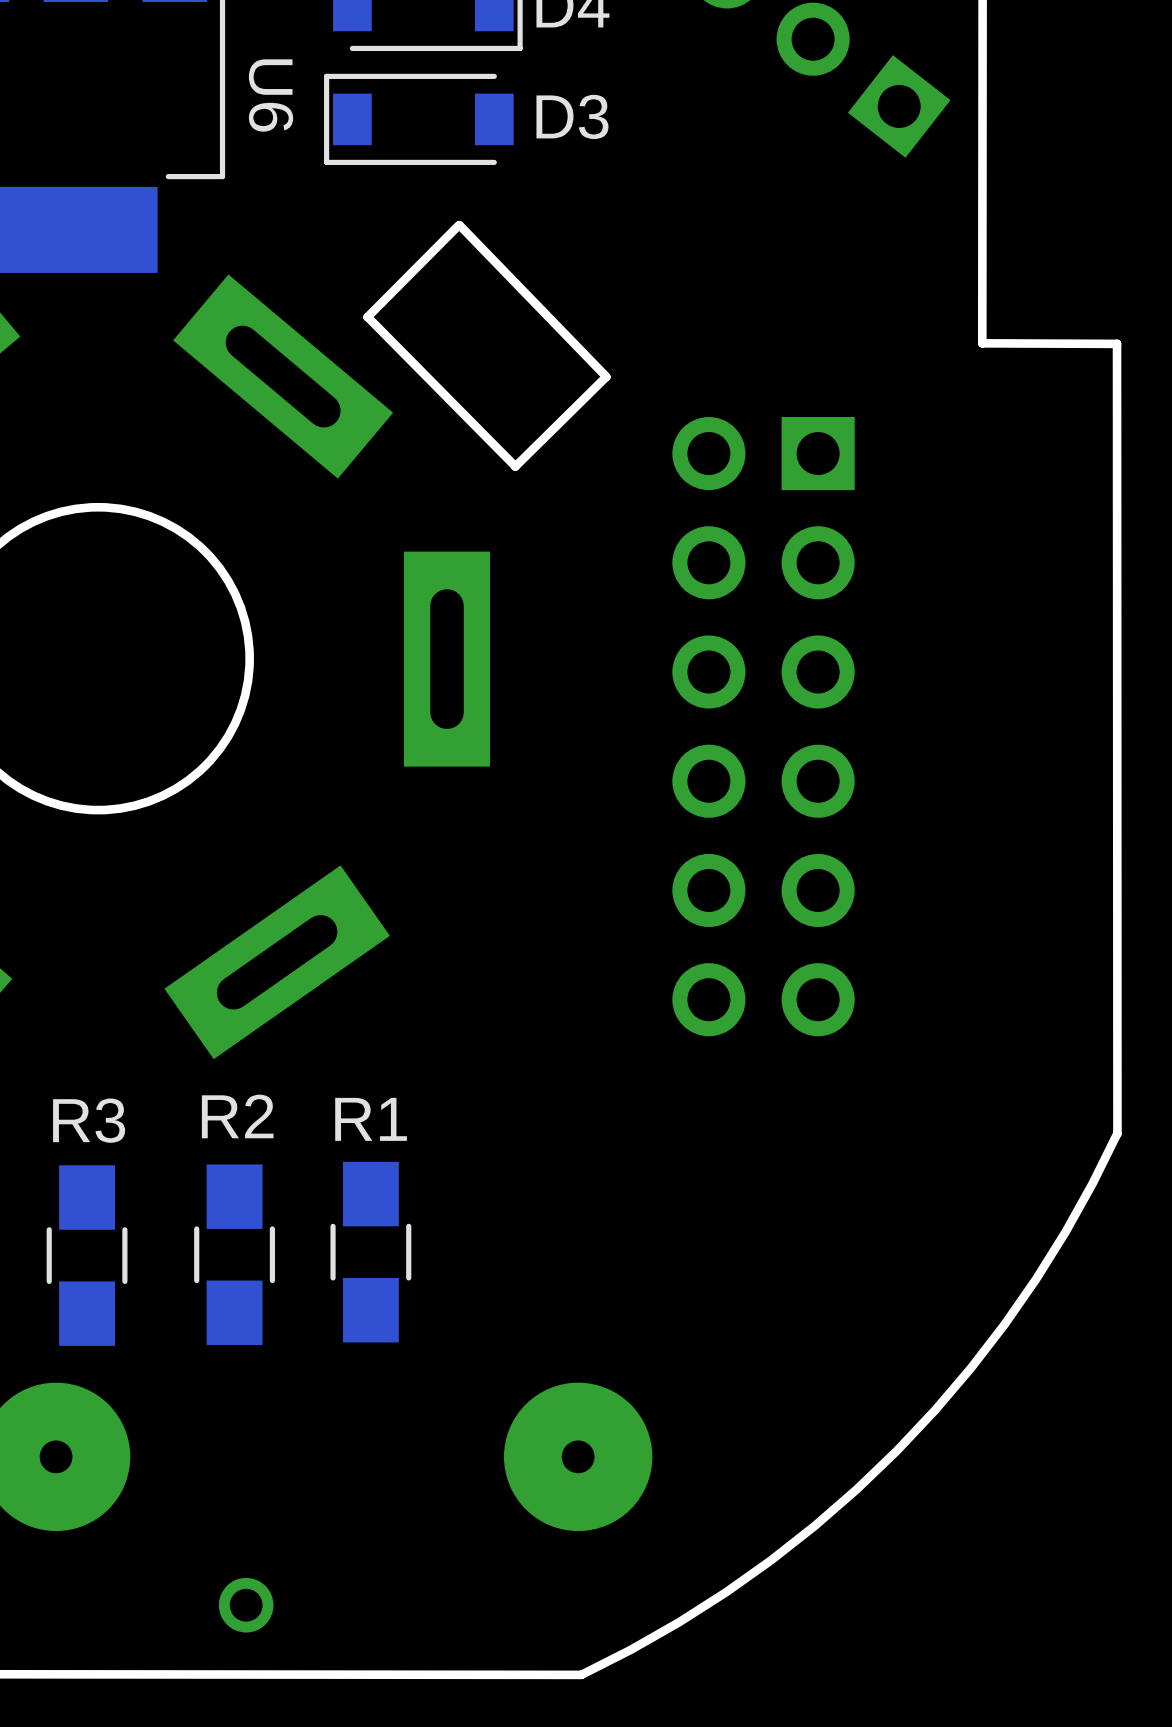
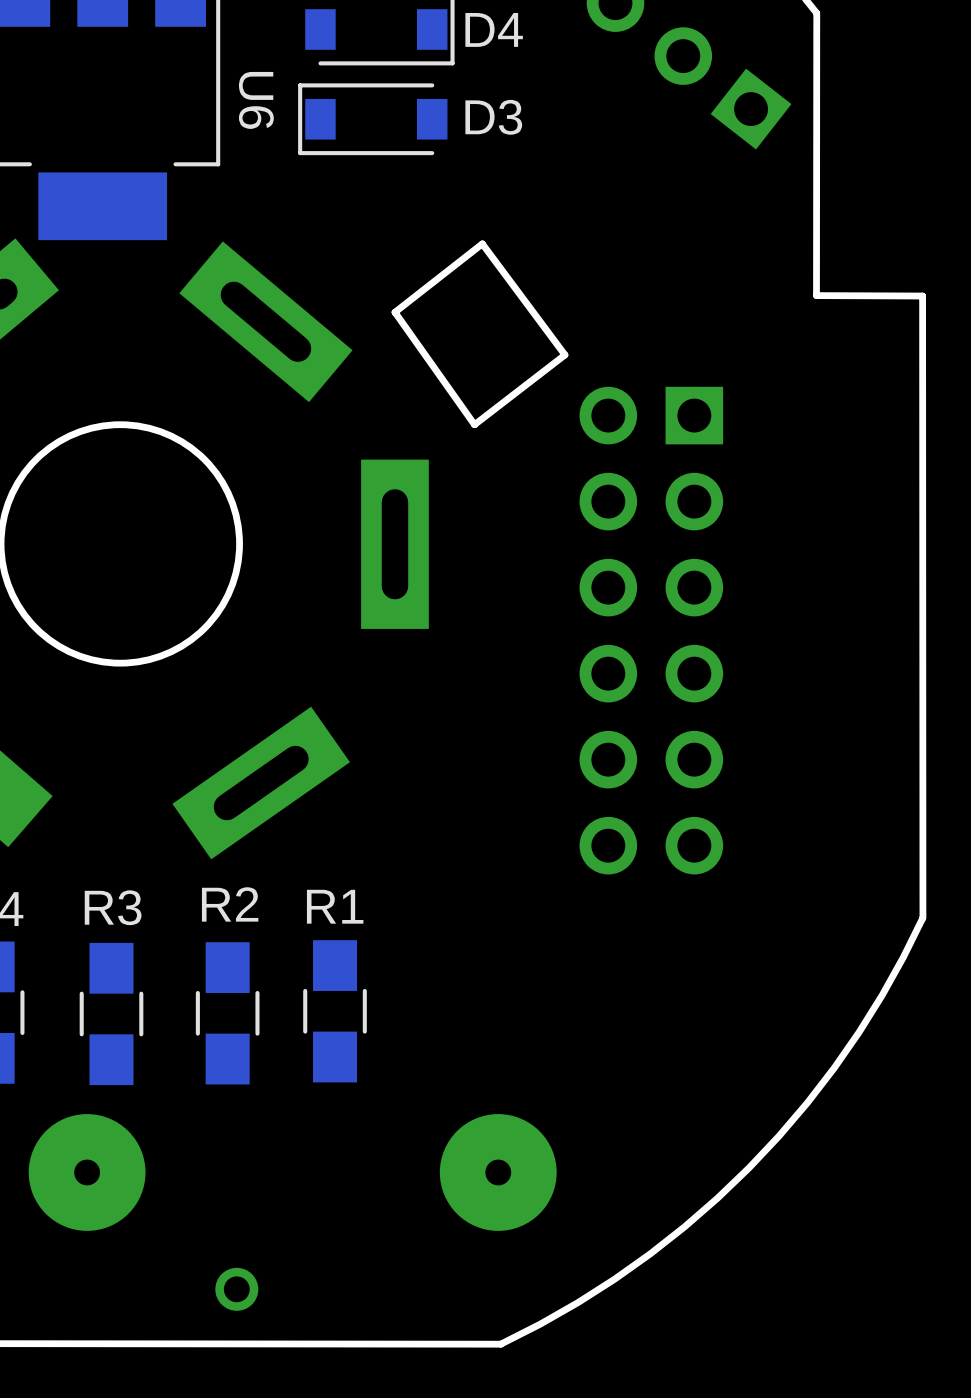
board edge: (458, 225) (367, 317) -> none
board edge: (459, 225) (606, 376) -> none
board edge: none -> (482, 243) (394, 312) (474, 424) (564, 354) (482, 243)
board edge: (367, 317) (515, 466) (606, 376) -> none
part position: (763, 726) -> (651, 630)

